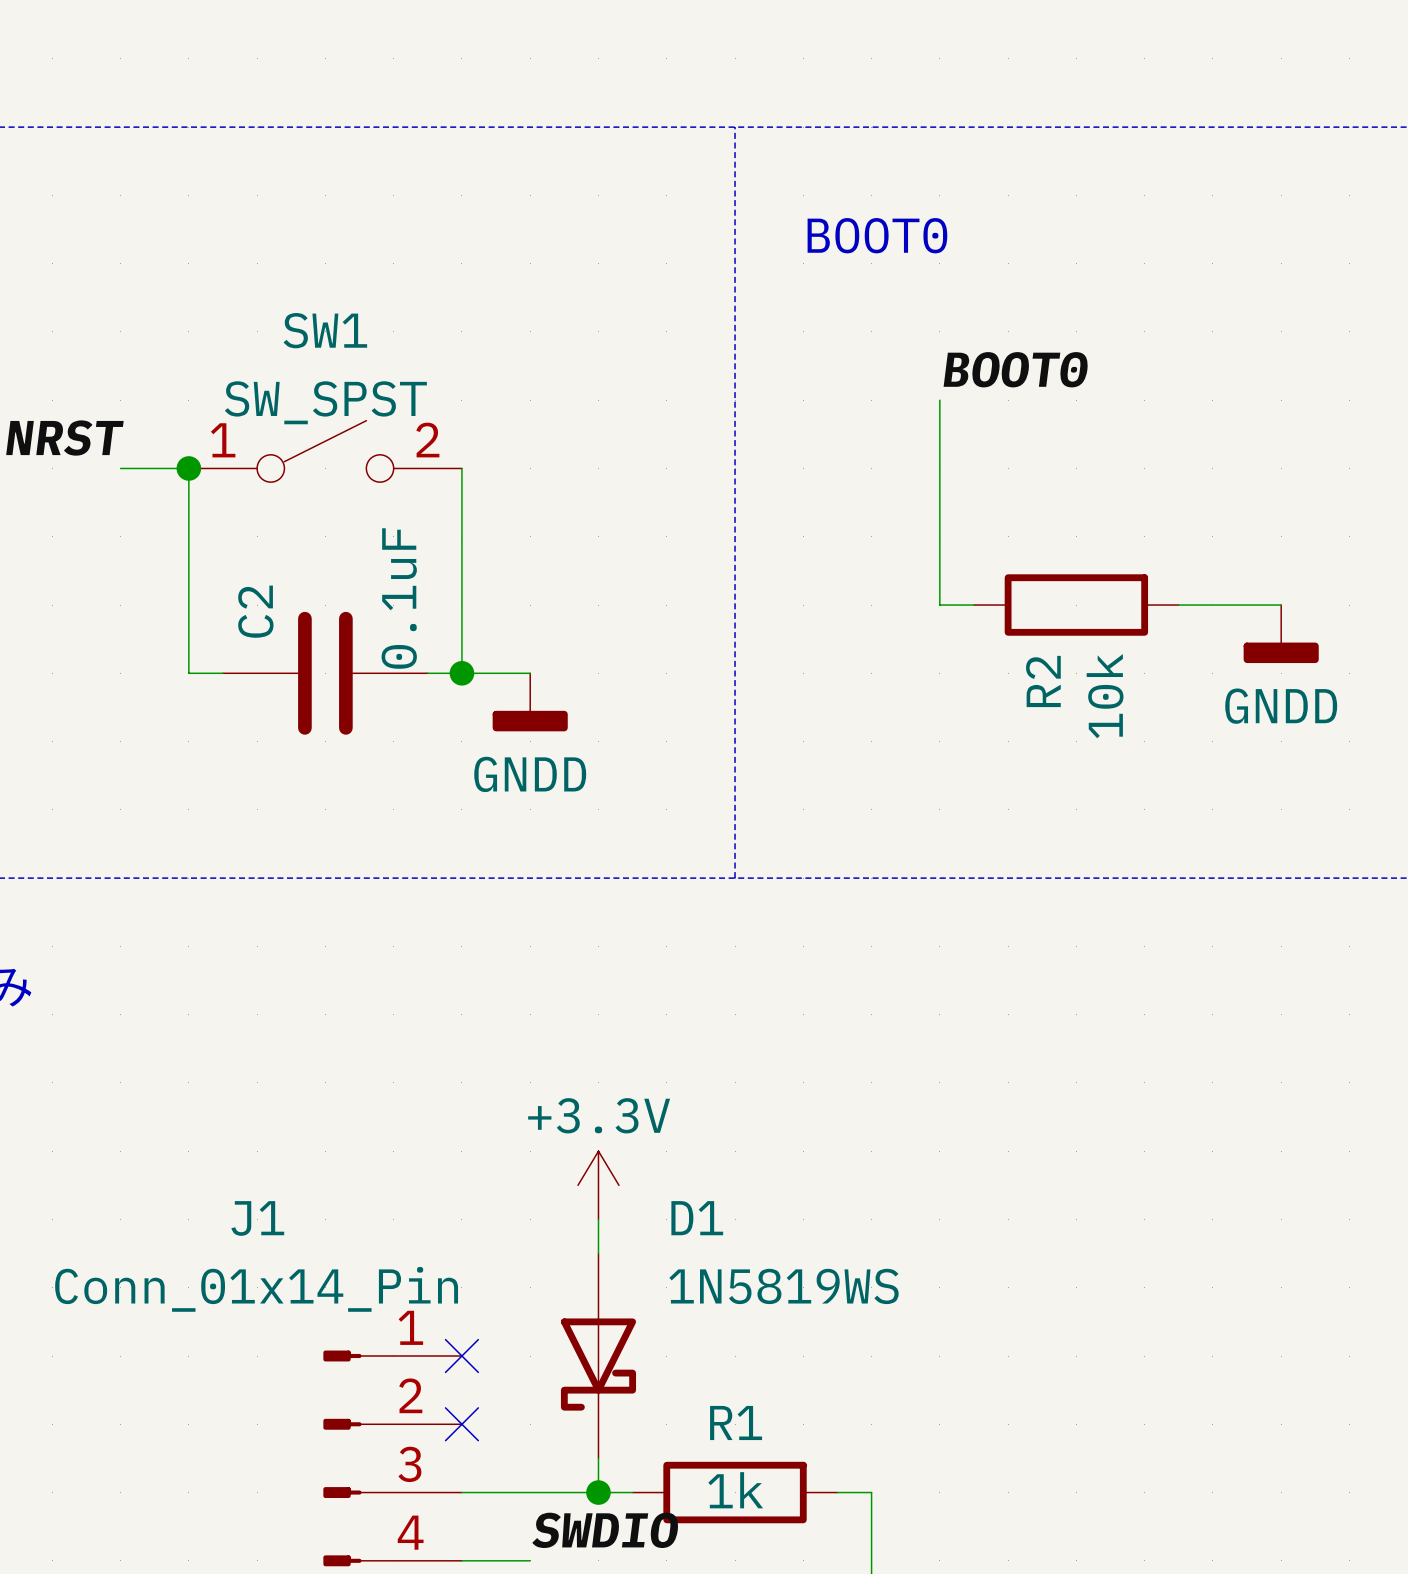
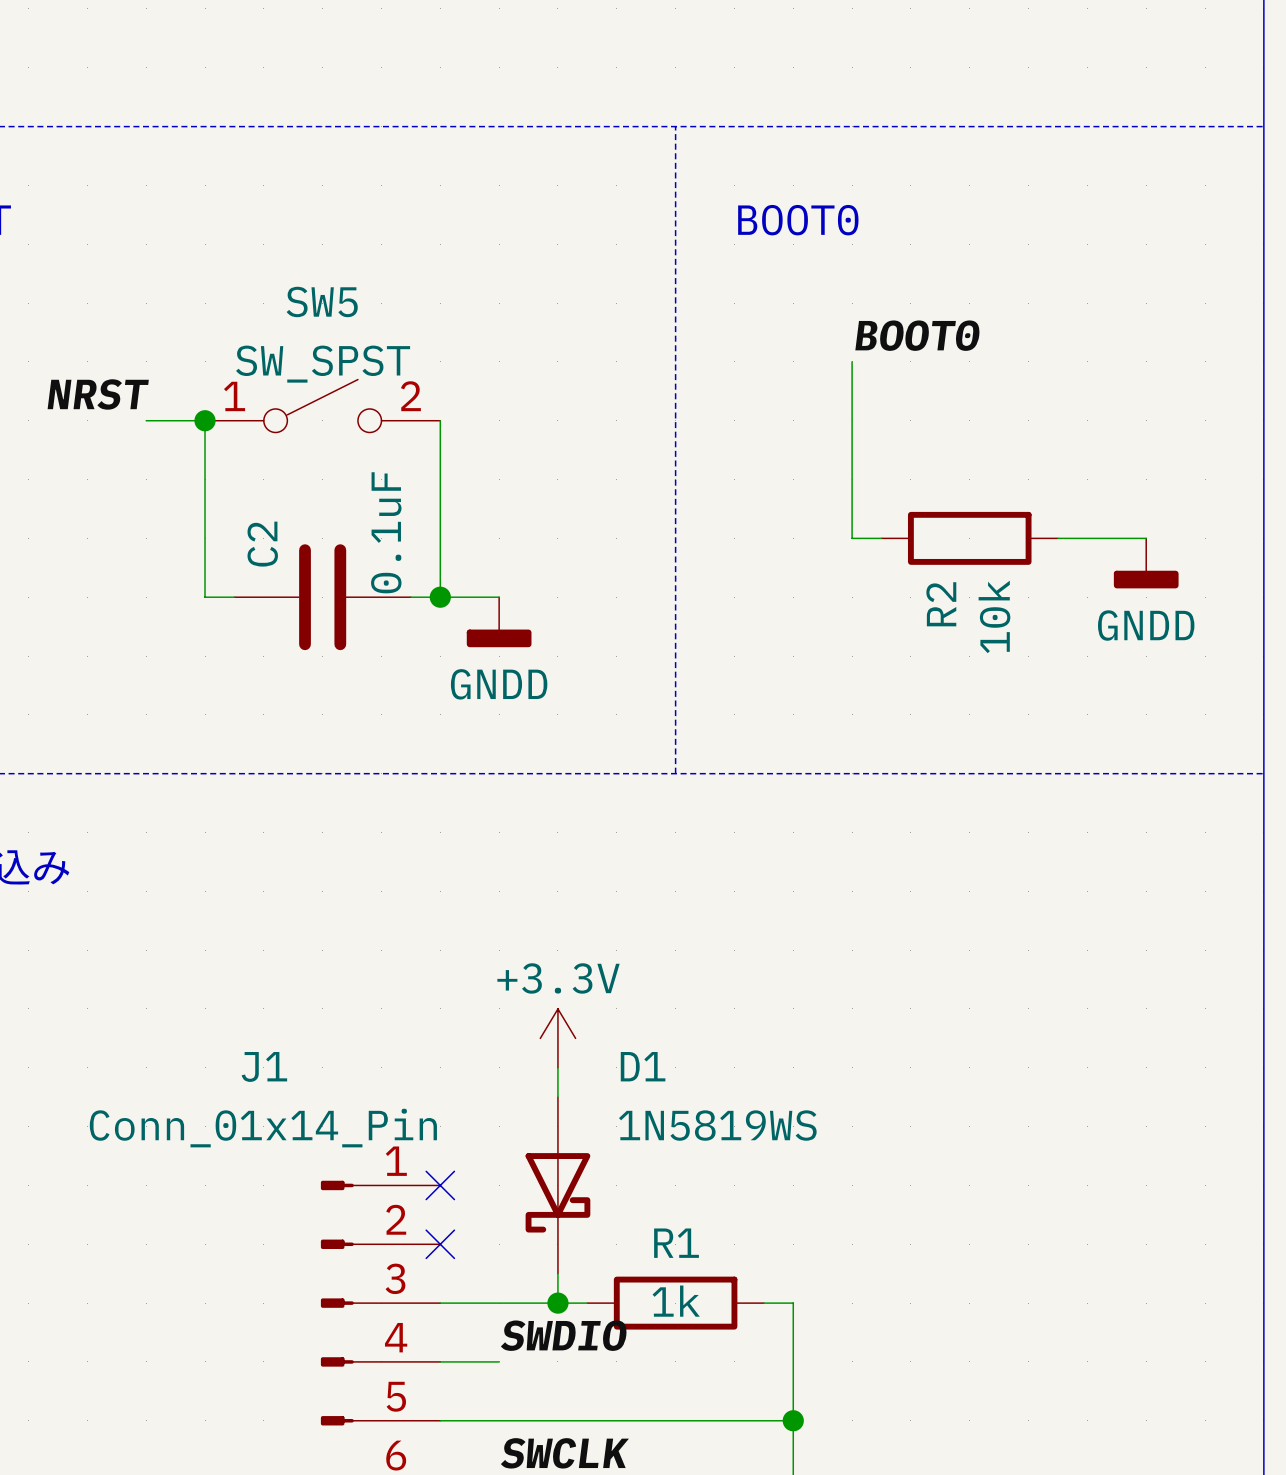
SW1 name: SW1 (325, 330) -> SW5 (322, 301)

